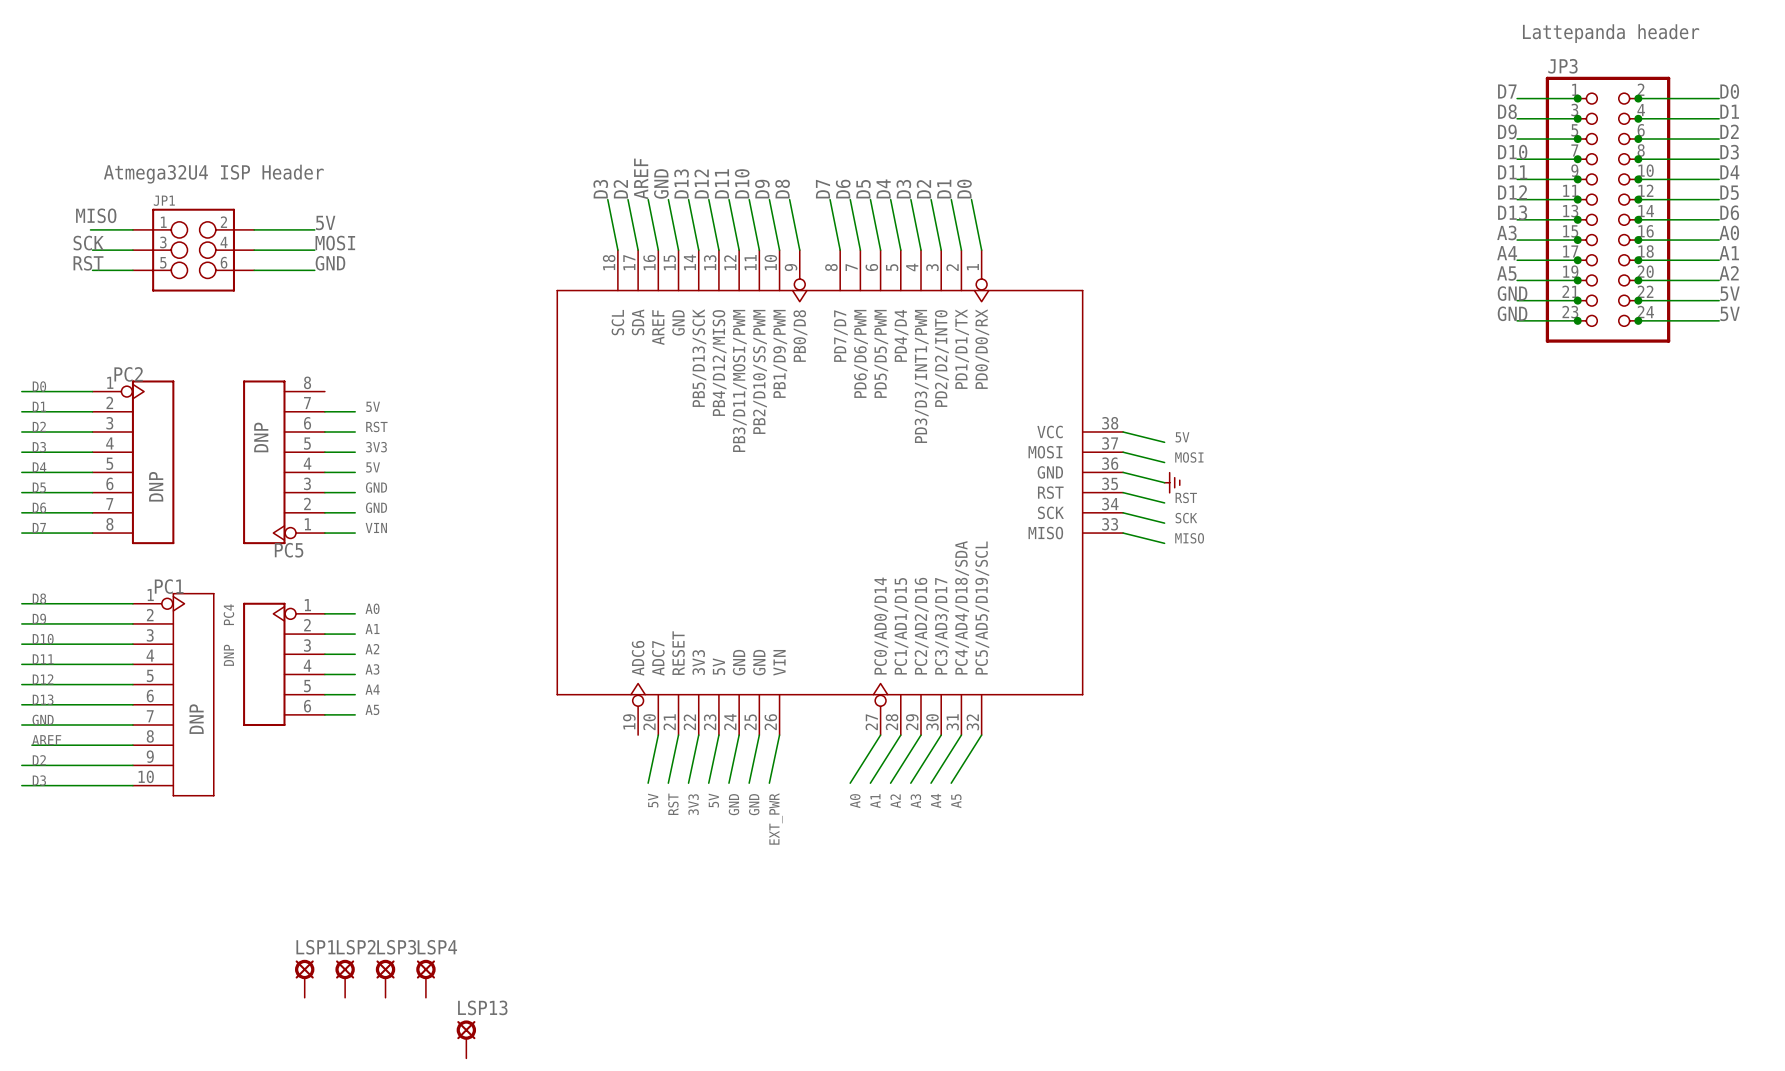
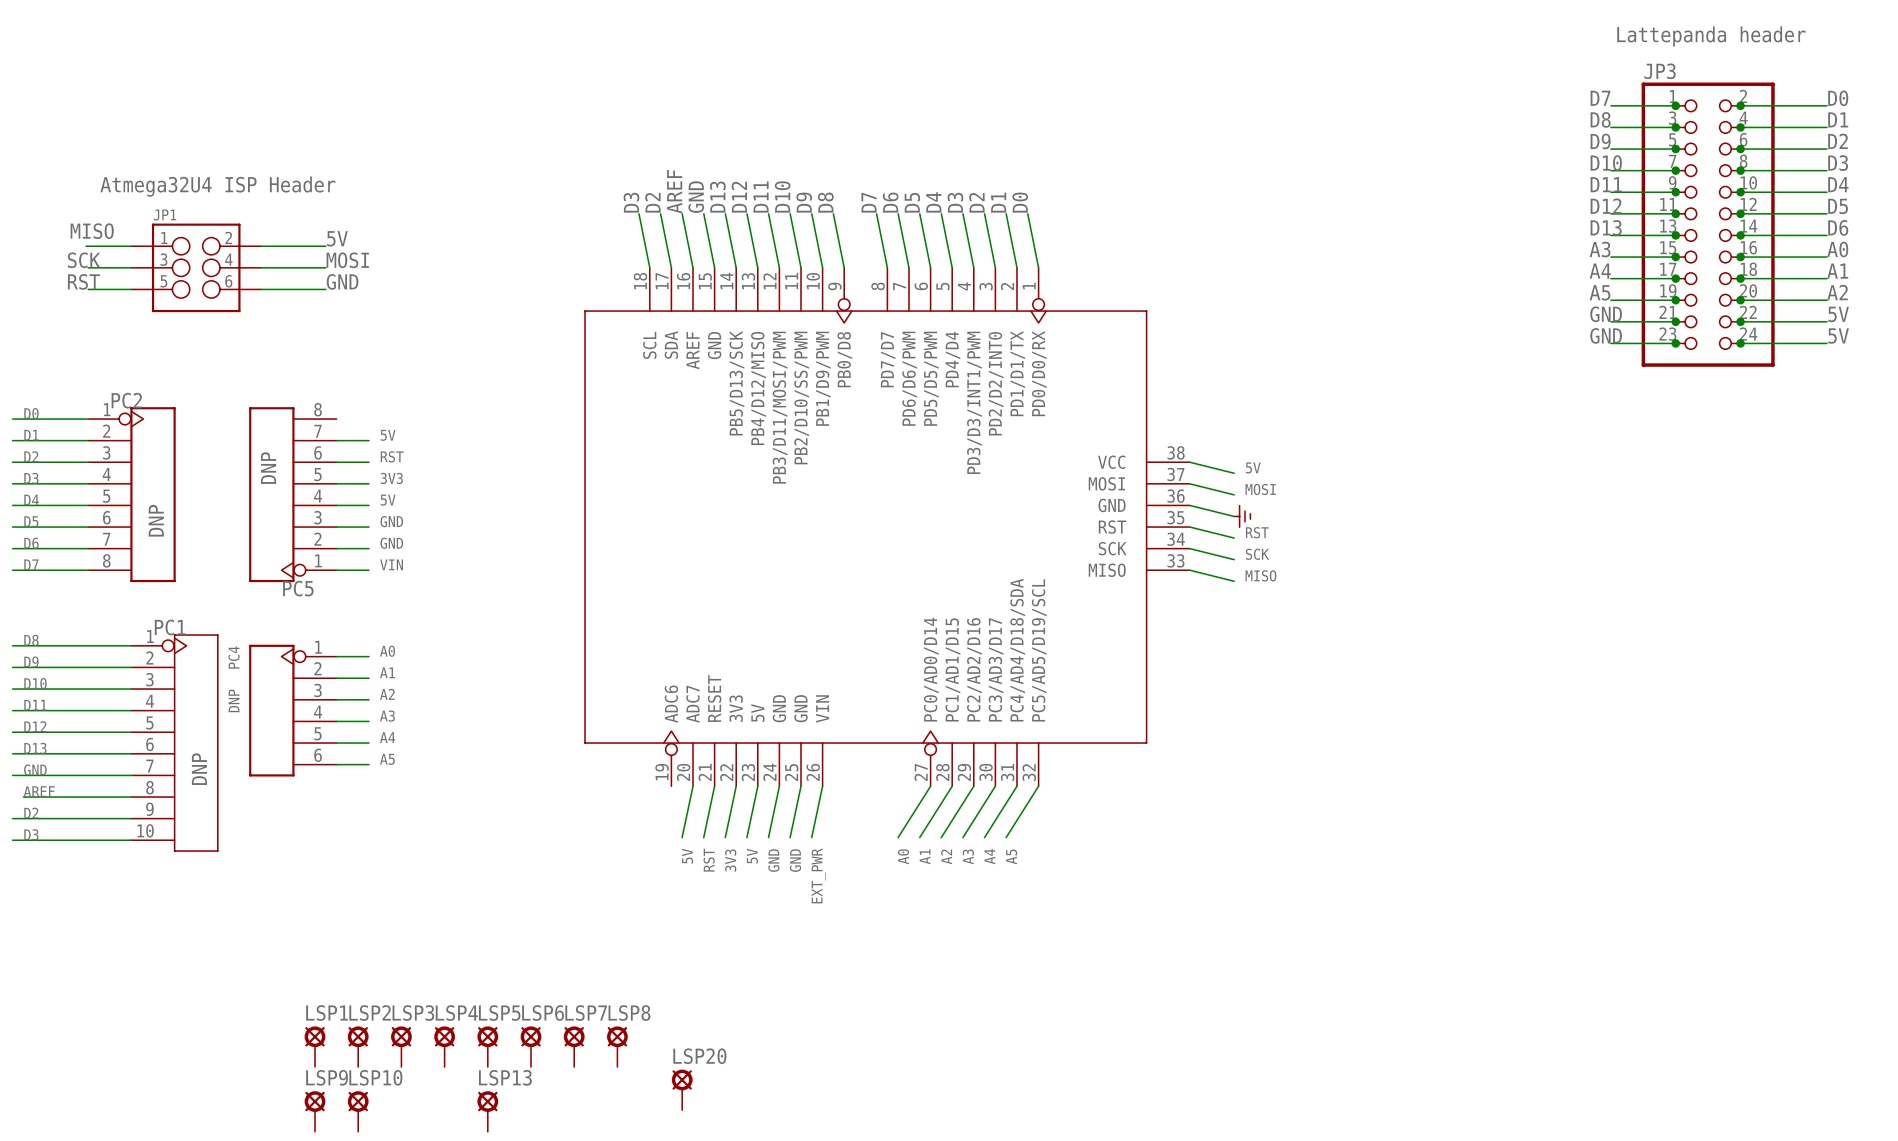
LSP5: none -> (487, 1046)
LSP6: none -> (531, 1046)
LSP7: none -> (574, 1046)
LSP8: none -> (617, 1046)
LSP20: none -> (682, 1089)
LSP9: none -> (315, 1111)
LSP10: none -> (358, 1111)

